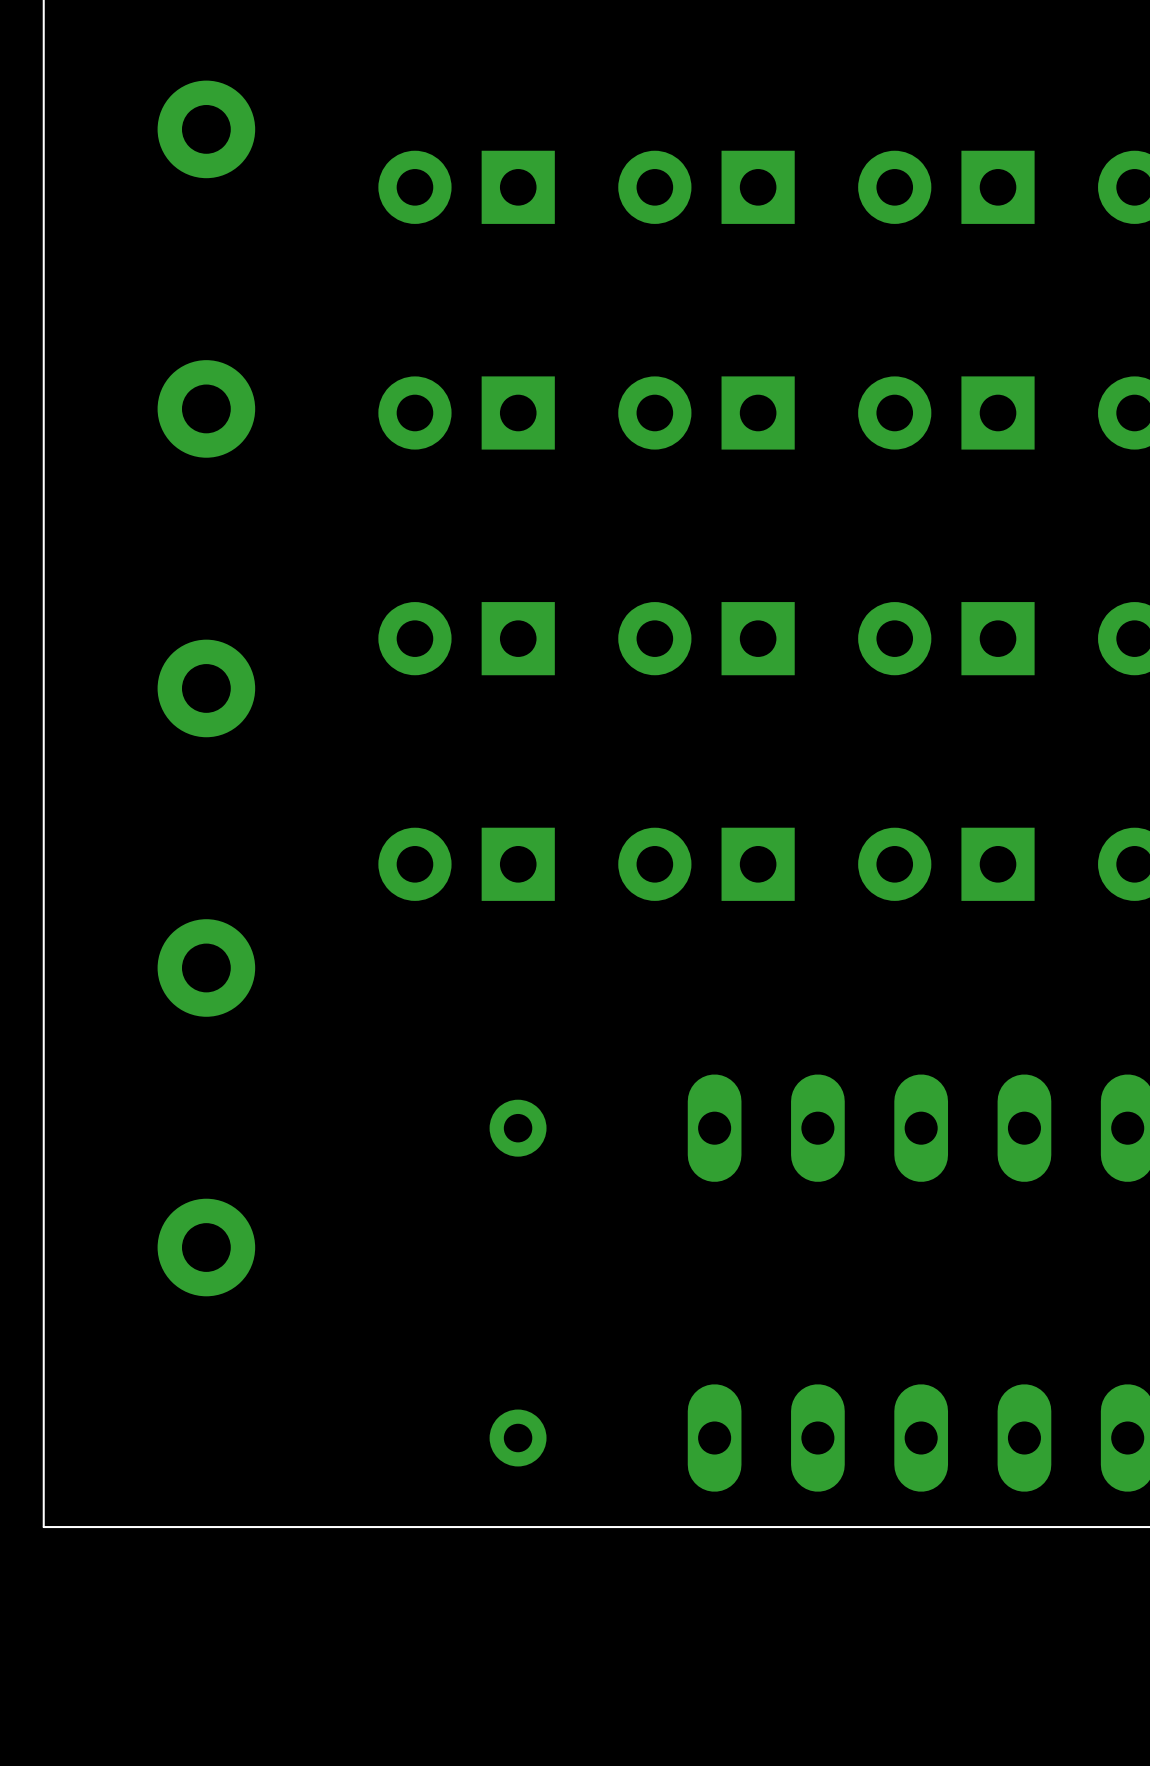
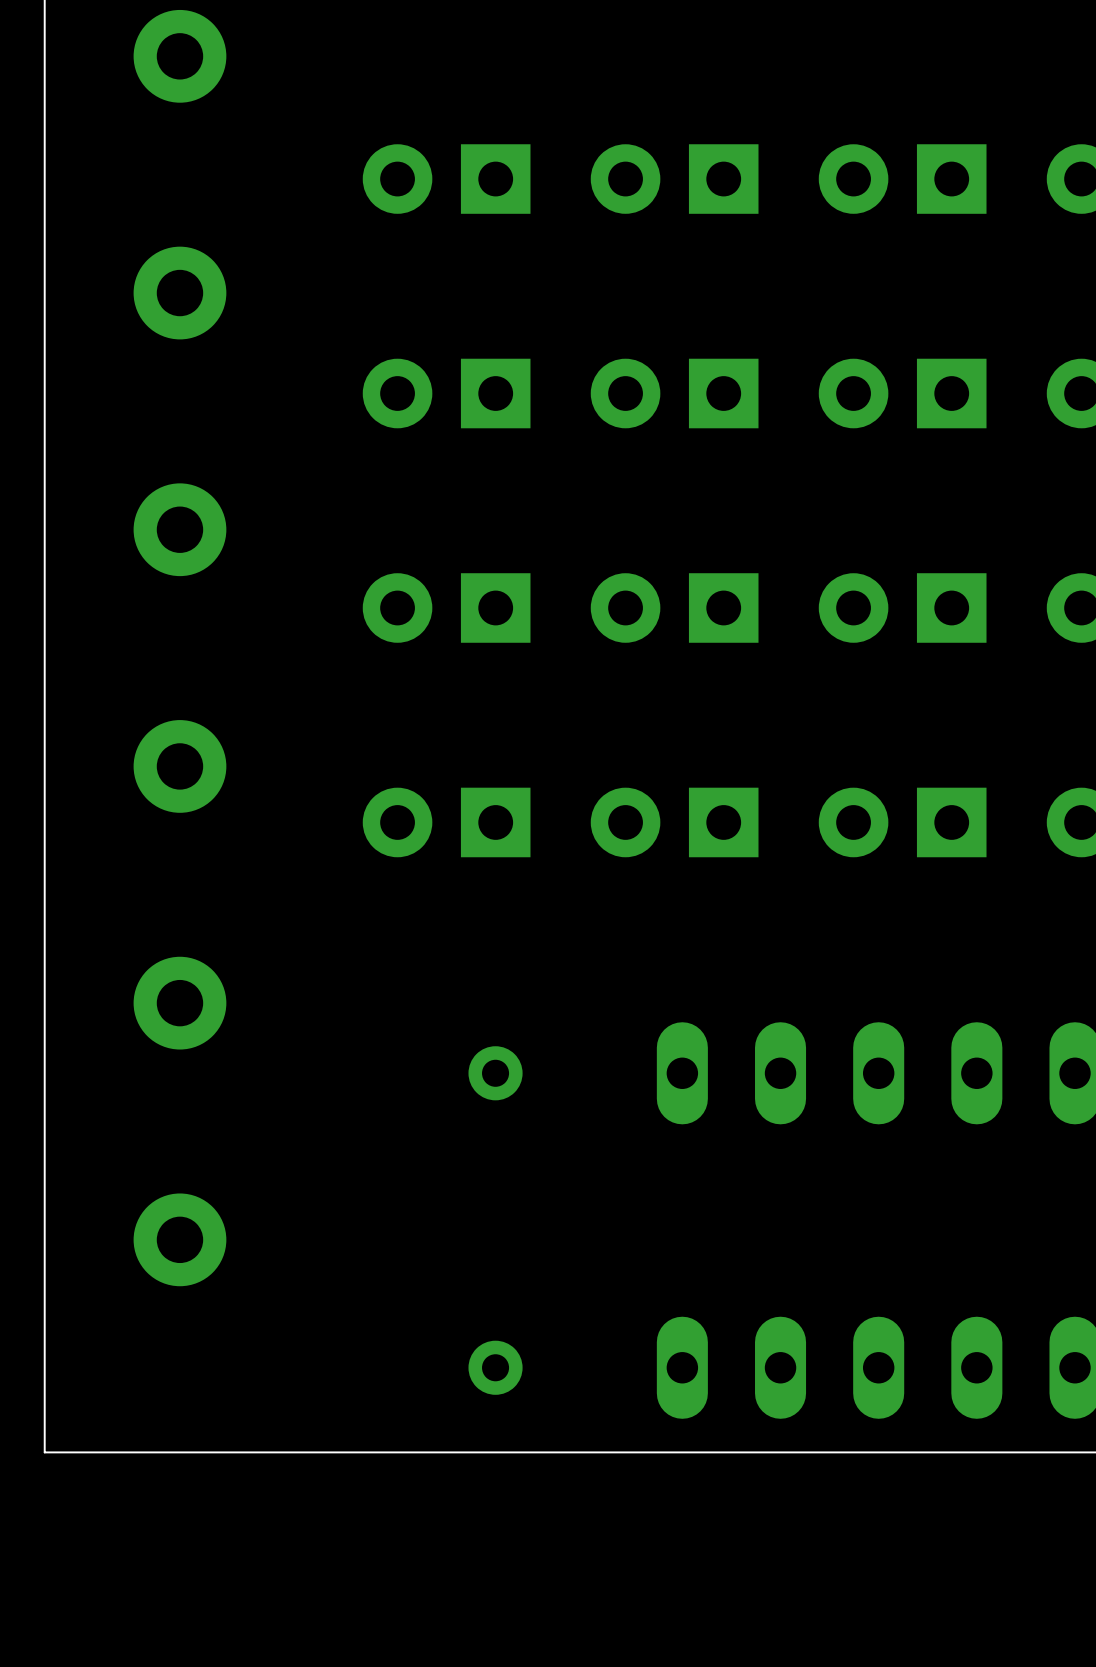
part position: (206, 129) -> (179, 56)
part: none -> (179, 293)
part: (206, 408) -> none
part: none -> (179, 529)
part: (206, 688) -> none
part: none -> (179, 766)
part: (206, 967) -> none
part: none -> (179, 1003)
part position: (206, 1247) -> (179, 1239)

